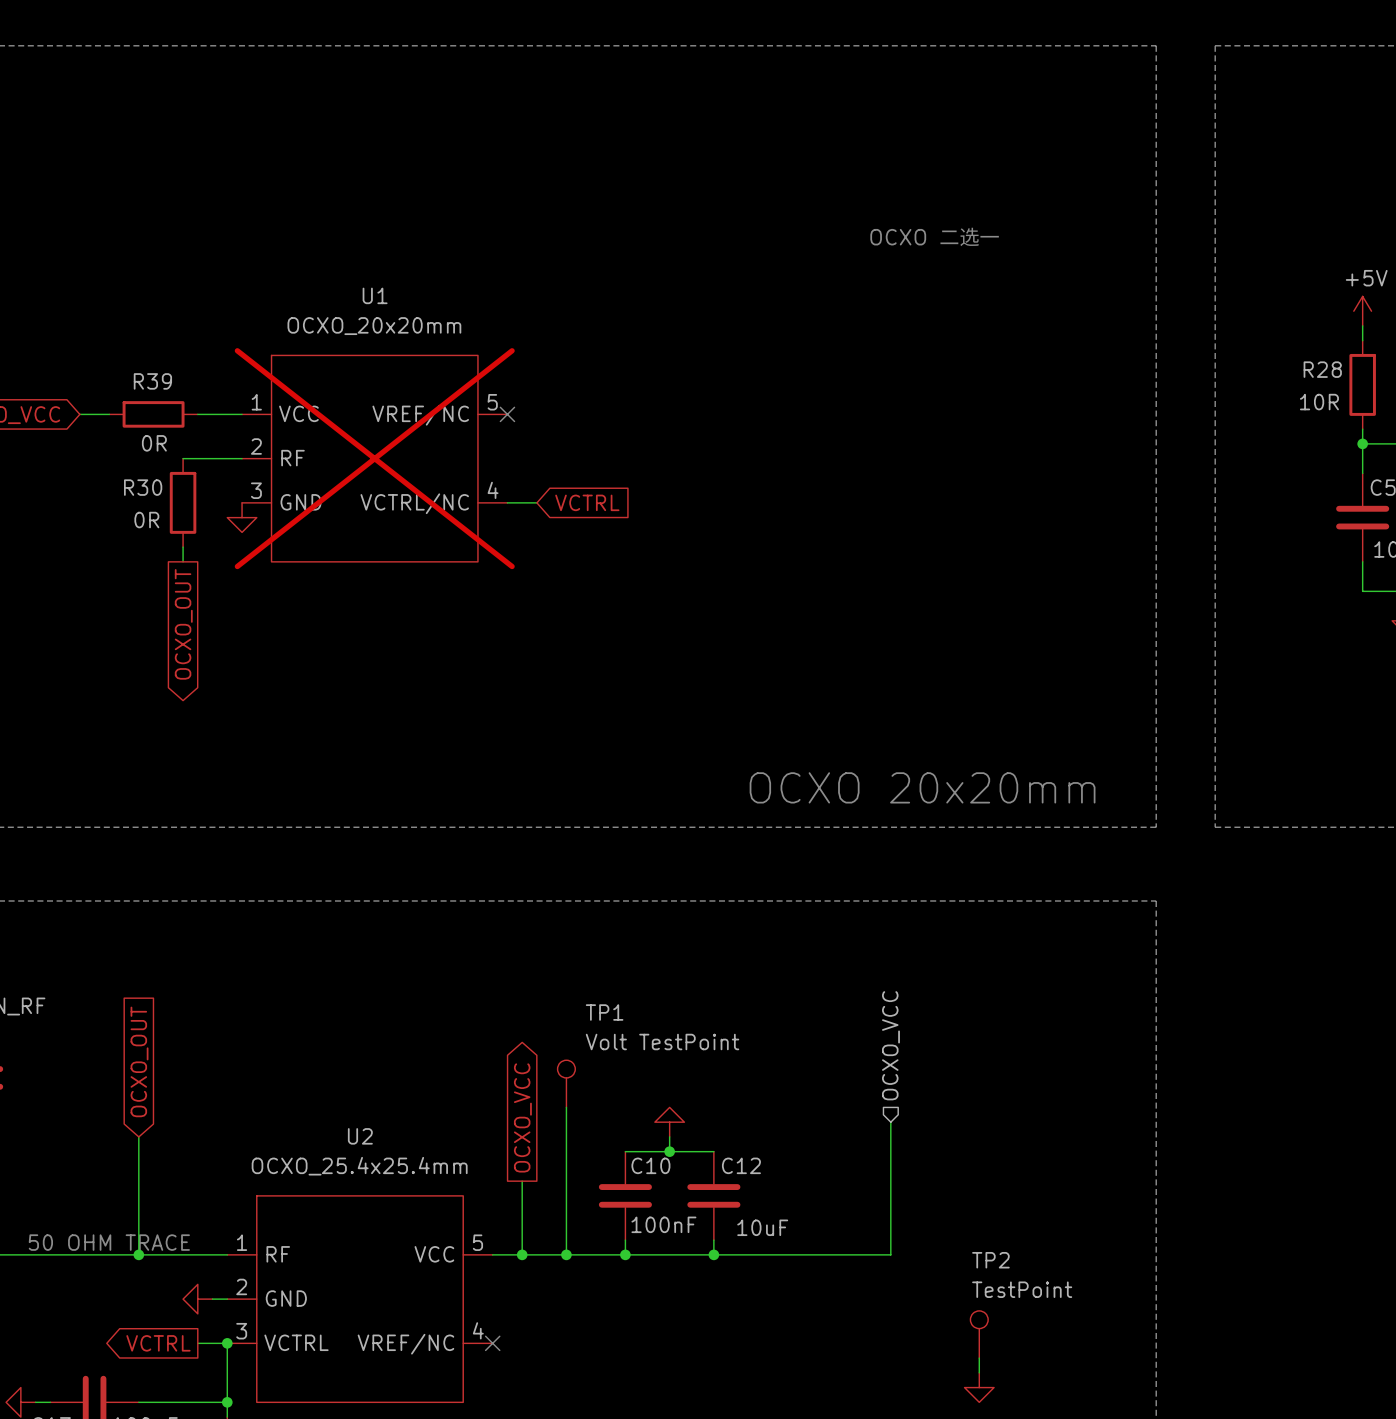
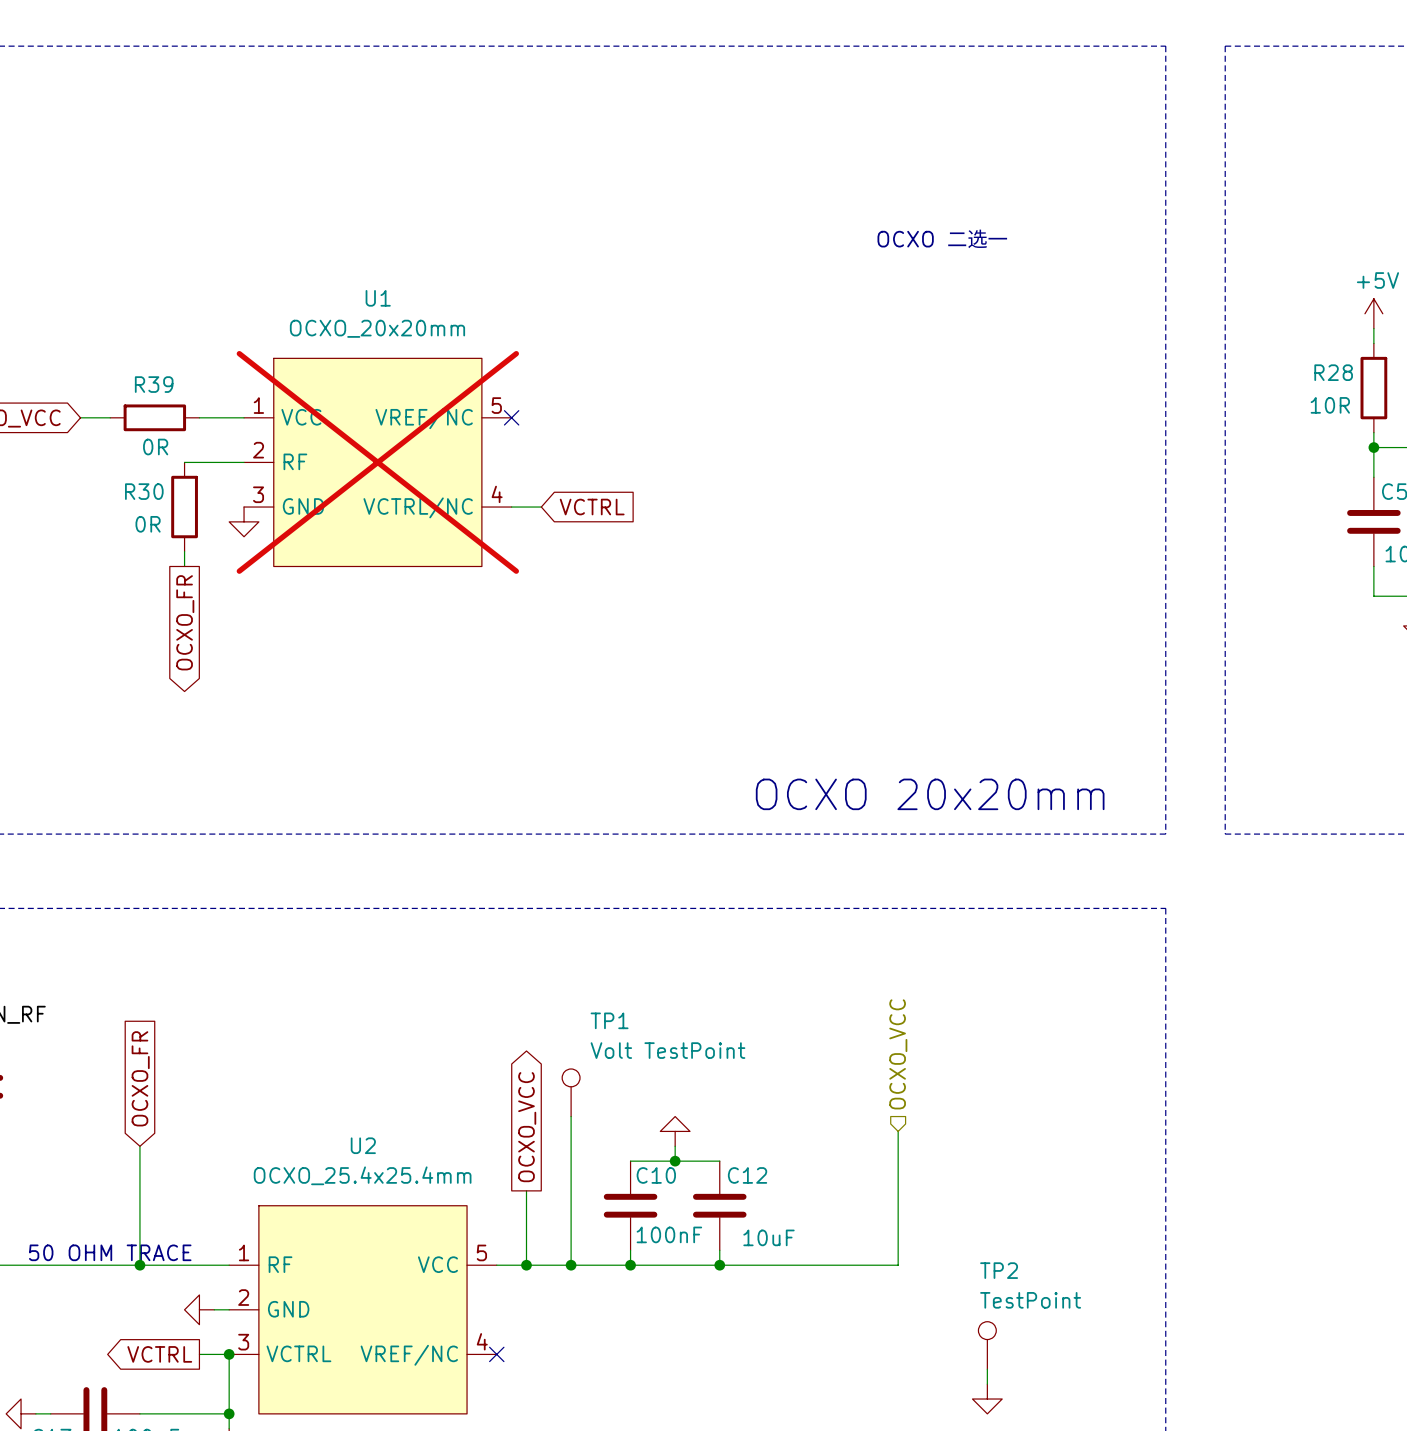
global label: OCXO_OUT (183, 624) -> OCXO_FR (185, 622)
global label: OCXO_OUT (139, 1061) -> OCXO_FR (140, 1078)

